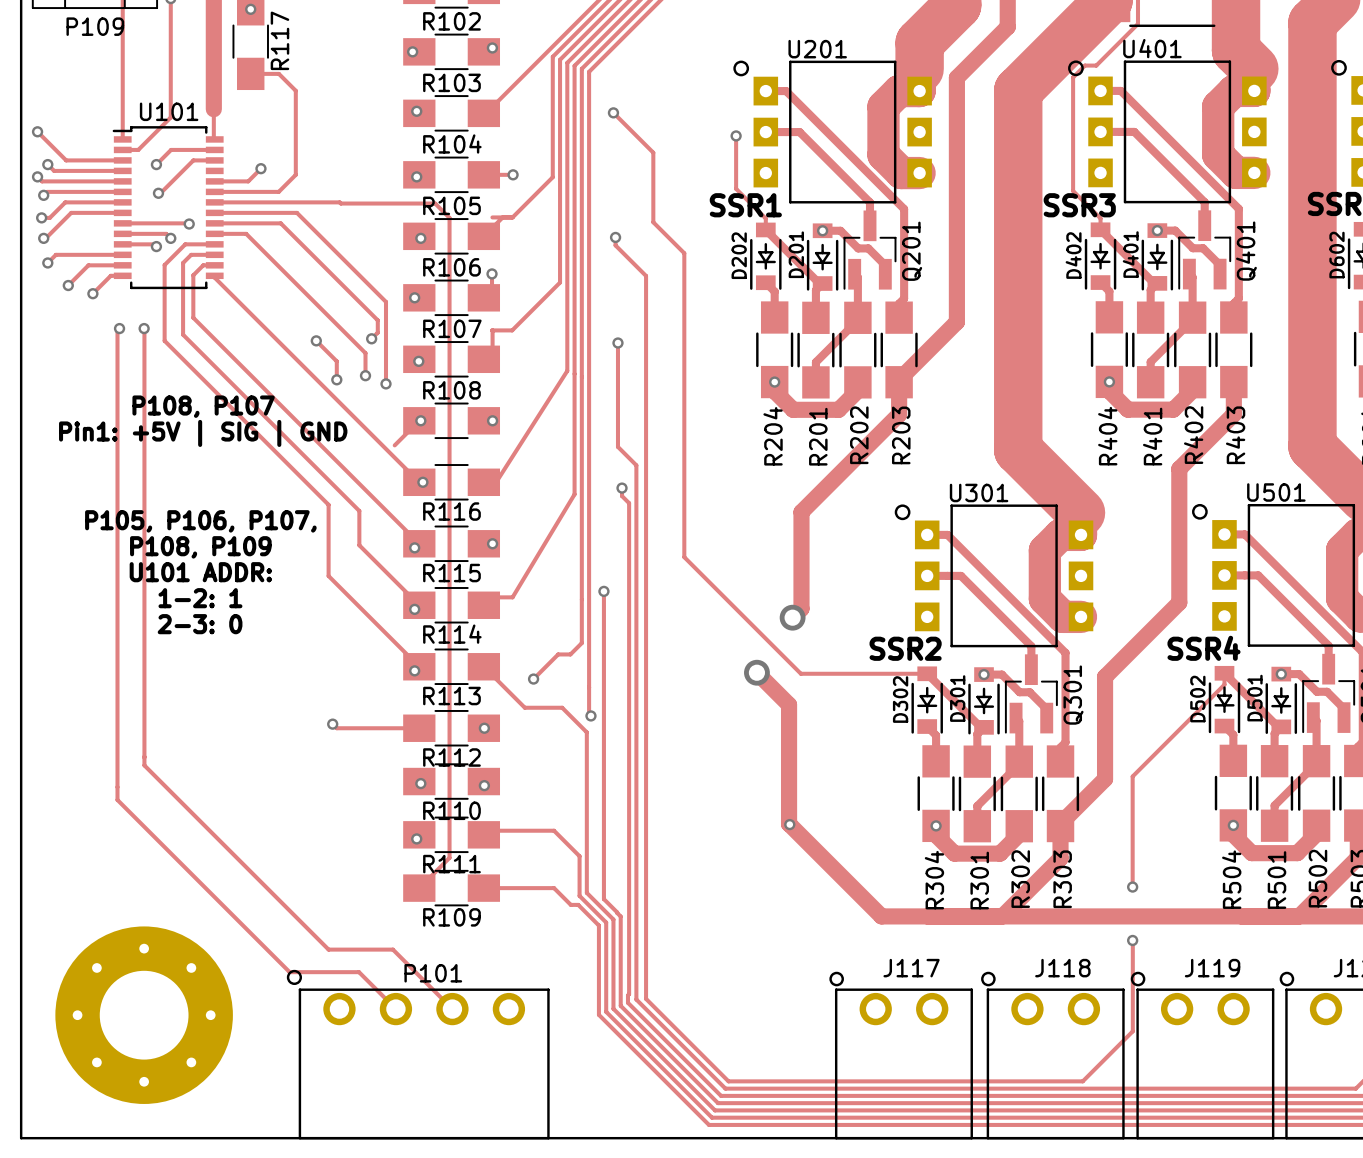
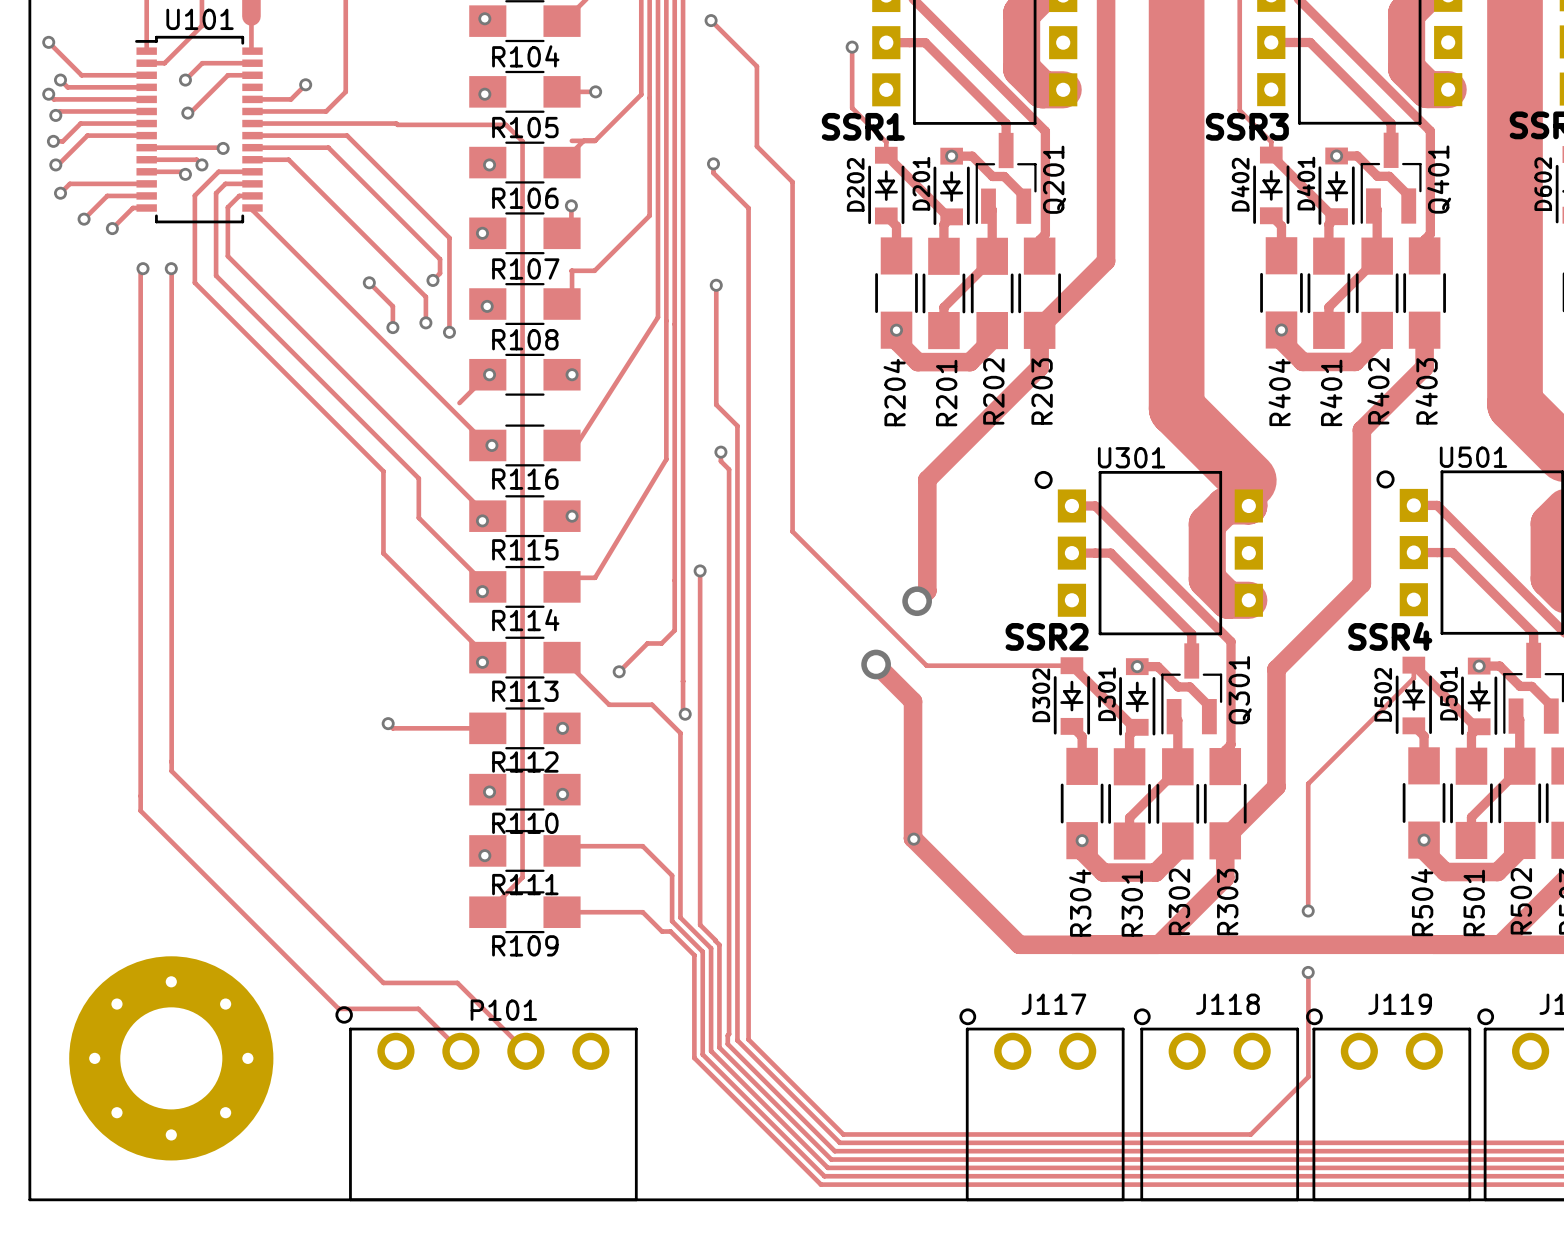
text: P108, P107 (203, 406) -> none
text: Pin1: +5V | SIG | GND (203, 433) -> none
text: P105, P106, P107, (200, 521) -> none
text: P108, P109 (200, 547) -> none
text: U101 ADDR: (200, 572) -> none
text: 1-2: 1 (200, 598) -> none
text: 2-3: 0 (200, 624) -> none

